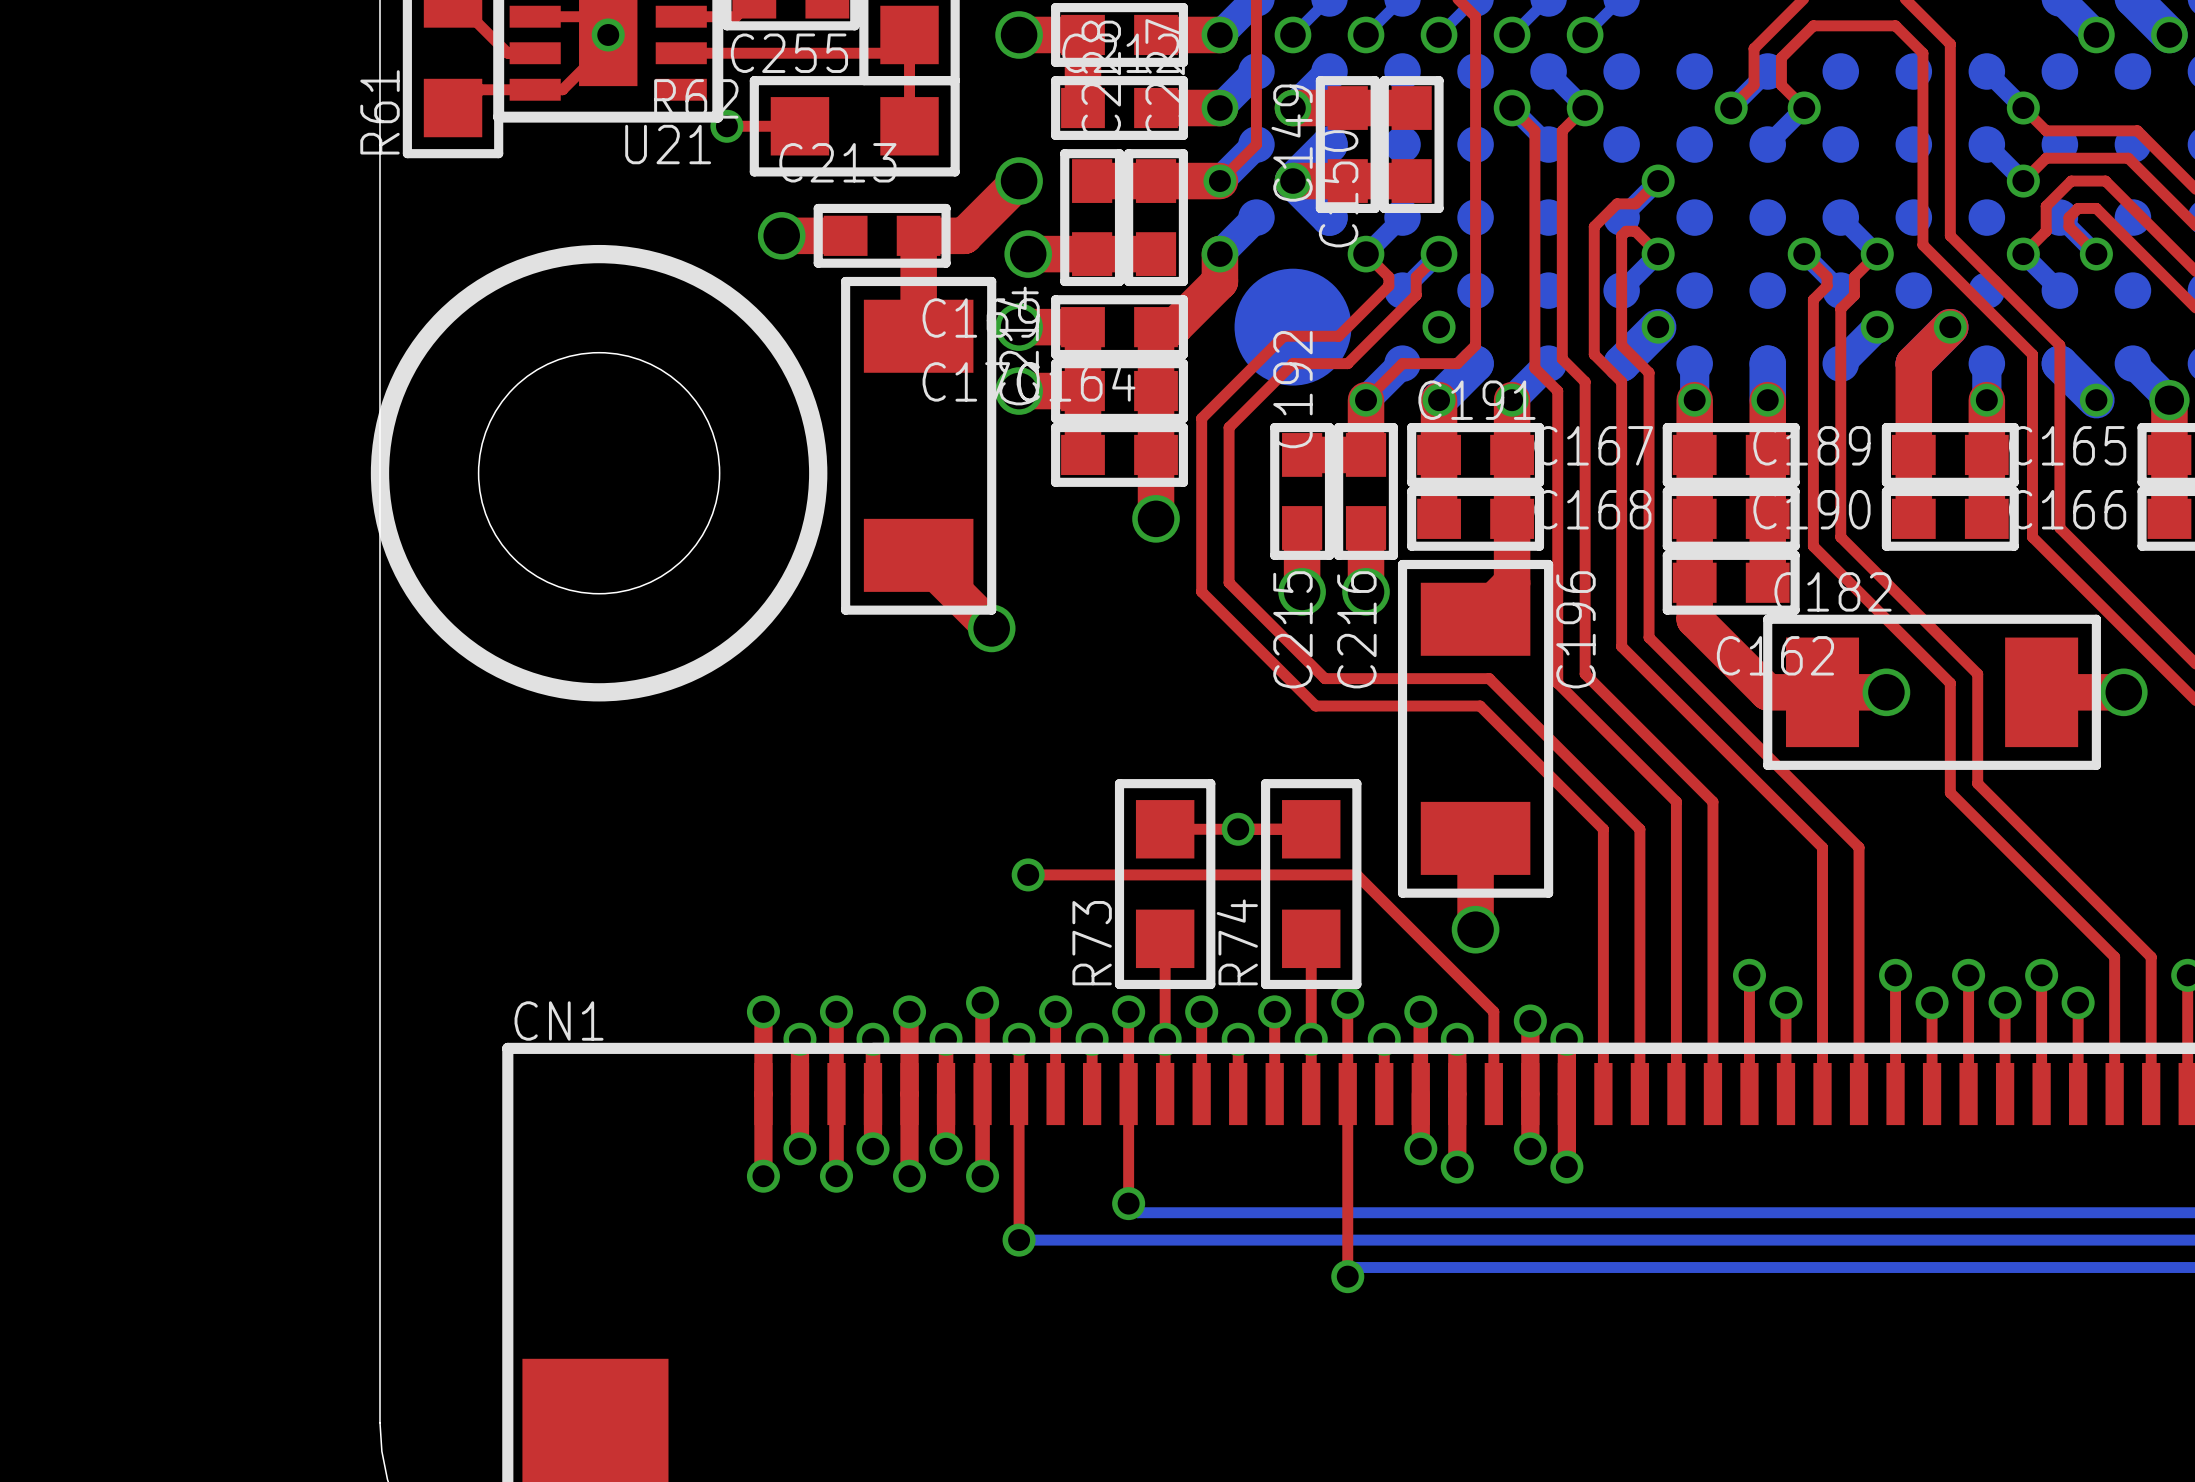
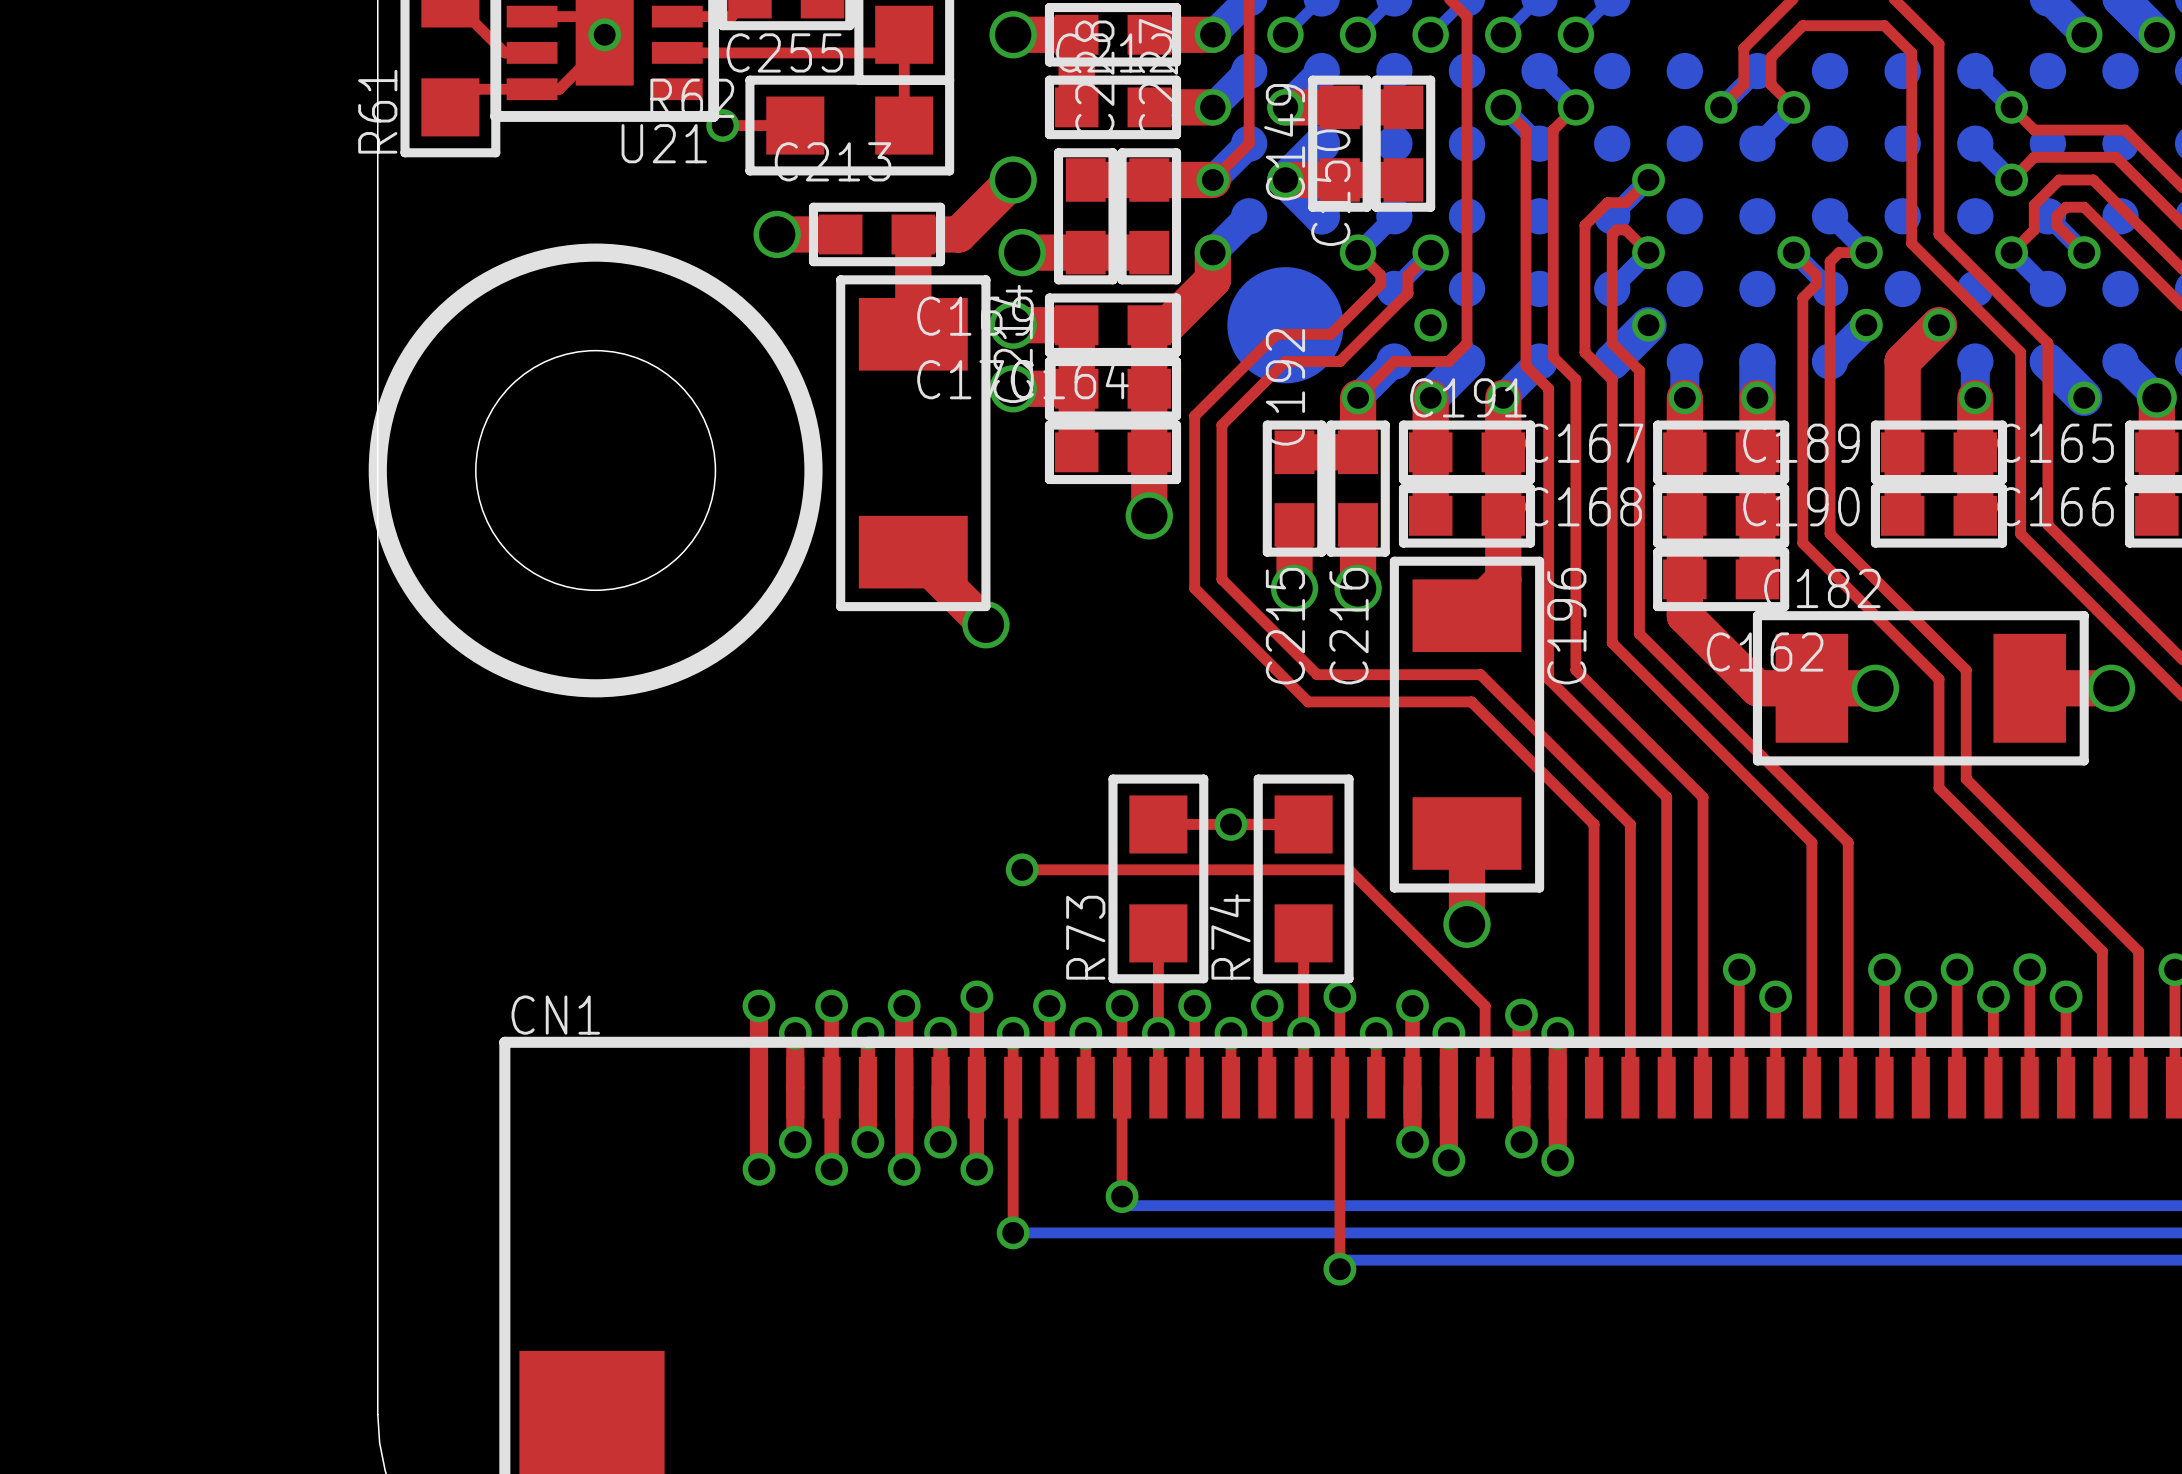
top track: (1877, 254) (1854, 276) (1854, 295) (1840, 308) -> (1866, 252) (1839, 252) (1830, 261) (1830, 307)

